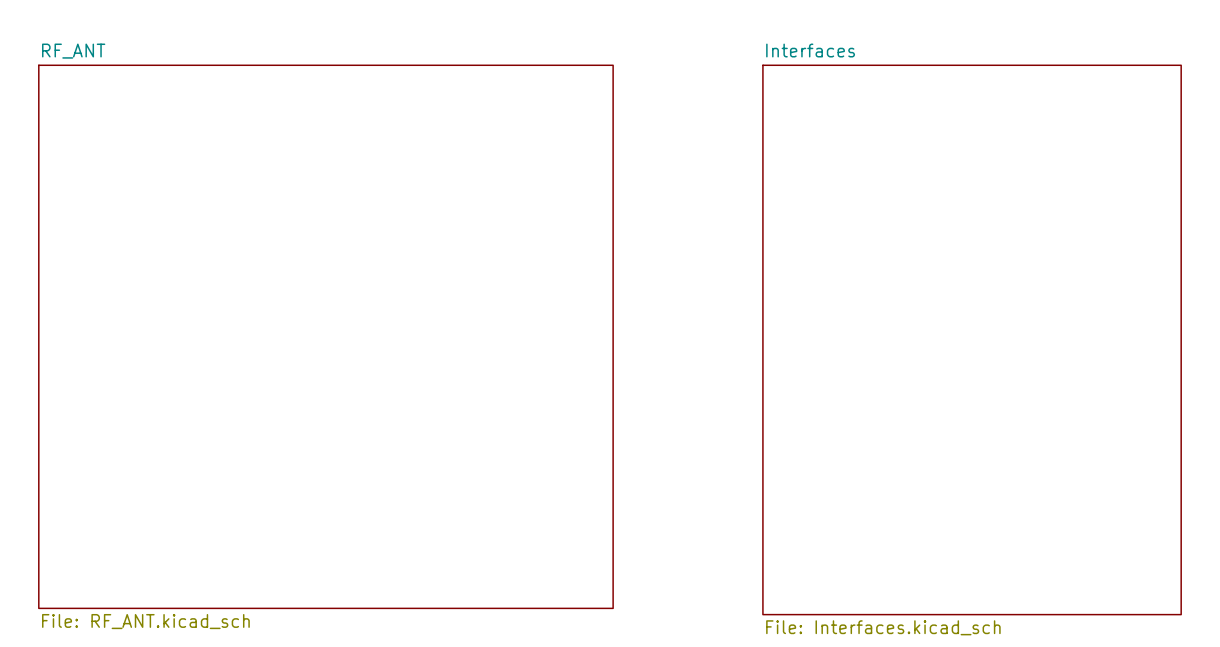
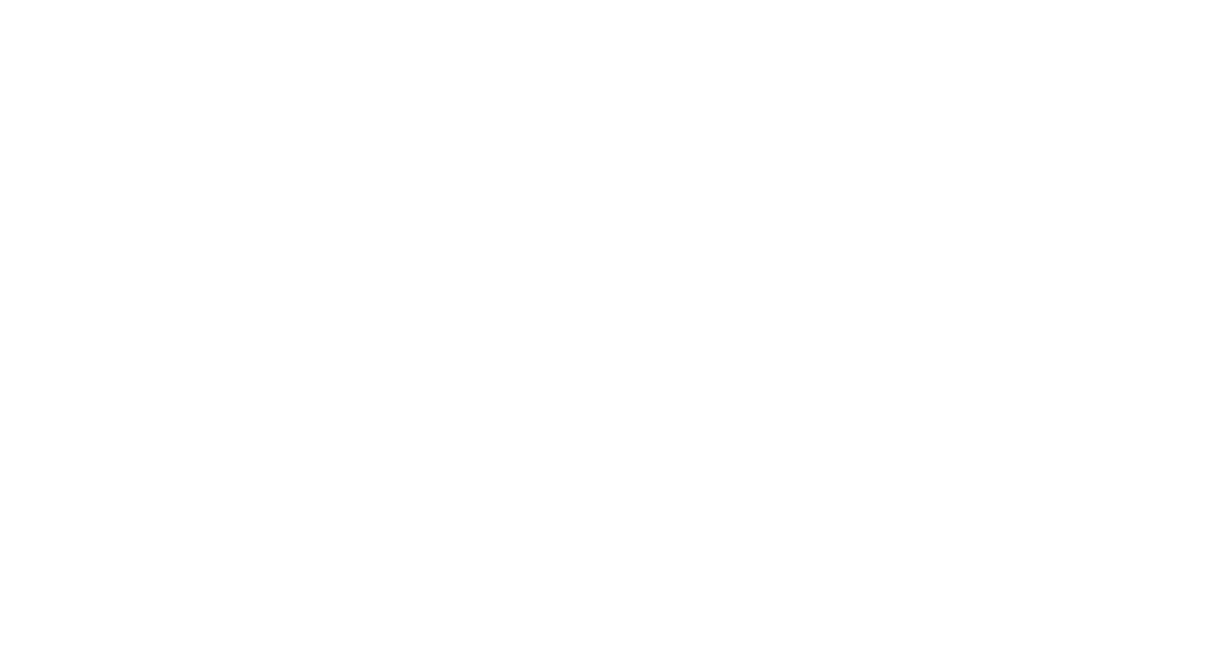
sheet RF_ANT: File: RF_ANT.kicad_sch (325, 336) -> none
sheet Interfaces: File: Interfaces.kicad_sch (972, 339) -> none

